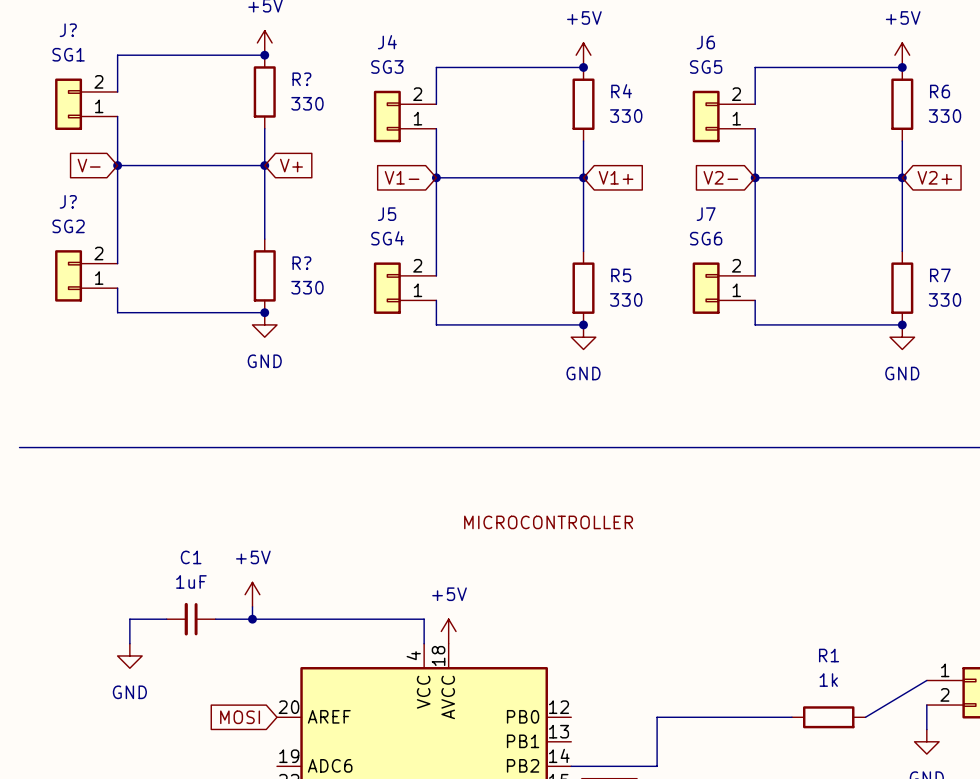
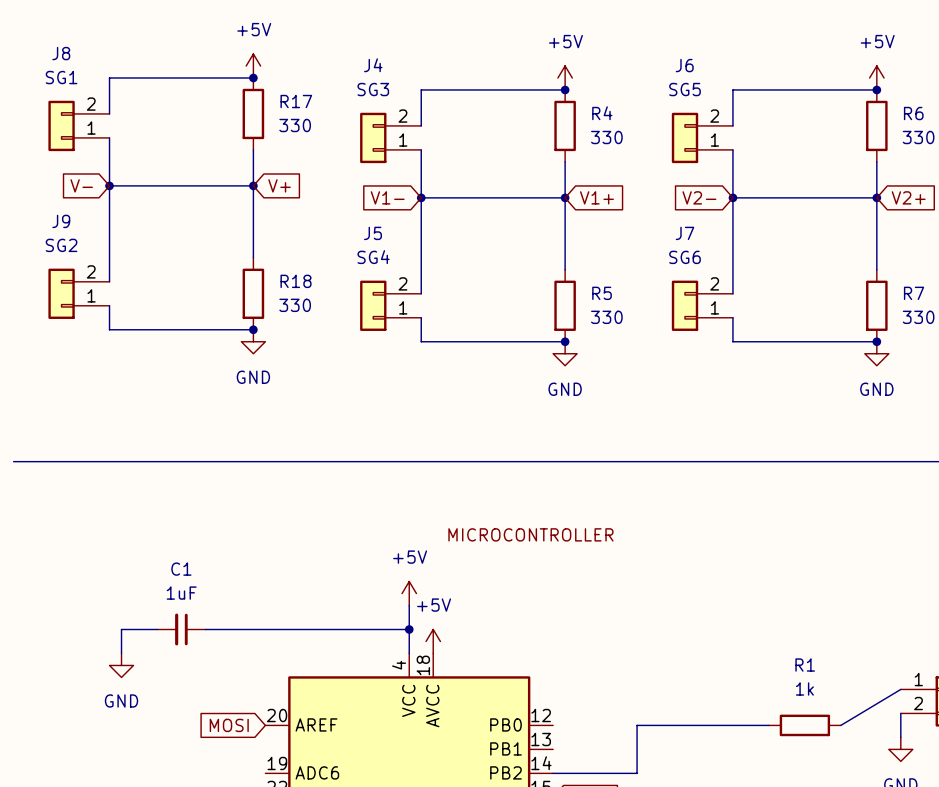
J? name: J? (68, 30) -> J8 (61, 53)
R? name: R? (301, 79) -> R17 (296, 101)
J? name: J? (68, 201) -> J9 (61, 221)
R? name: R? (301, 263) -> R18 (296, 281)
power symbol position: +5V (252, 594) -> +5V (409, 593)
wire: none -> (409, 605) (409, 629)
wire: (252, 606) (252, 619) -> none
junction: (252, 619) -> none
junction: none -> (409, 629)

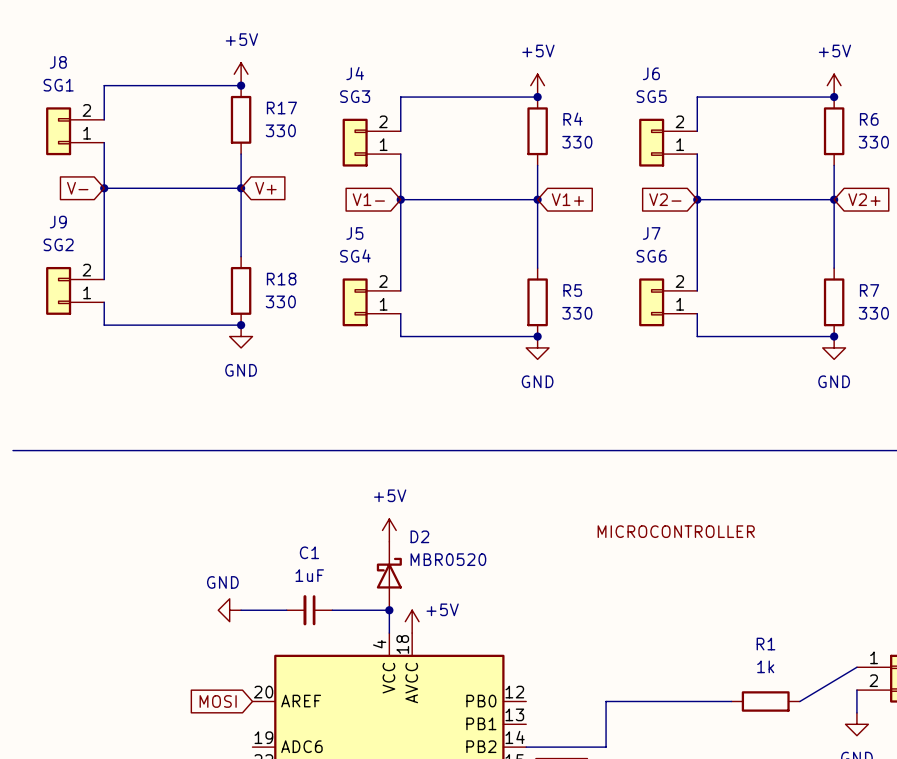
label position: MICROCONTROLLER (530, 534) -> MICROCONTROLLER (676, 531)
power symbol position: +5V (409, 593) -> +5V (389, 530)
D2: none -> MBR0520 (389, 576)
power symbol text position: +5V (434, 605) -> +5V (442, 609)
wire: (157, 629) (121, 629) (121, 653) -> none
C1 position: (181, 629) -> (309, 610)
wire: (205, 629) (253, 629) -> none
power symbol rotation: 0° (121, 665) -> 90° clockwise (229, 610)
power symbol position: GND (121, 665) -> GND (229, 610)
power symbol text position: GND (121, 700) -> GND (222, 582)

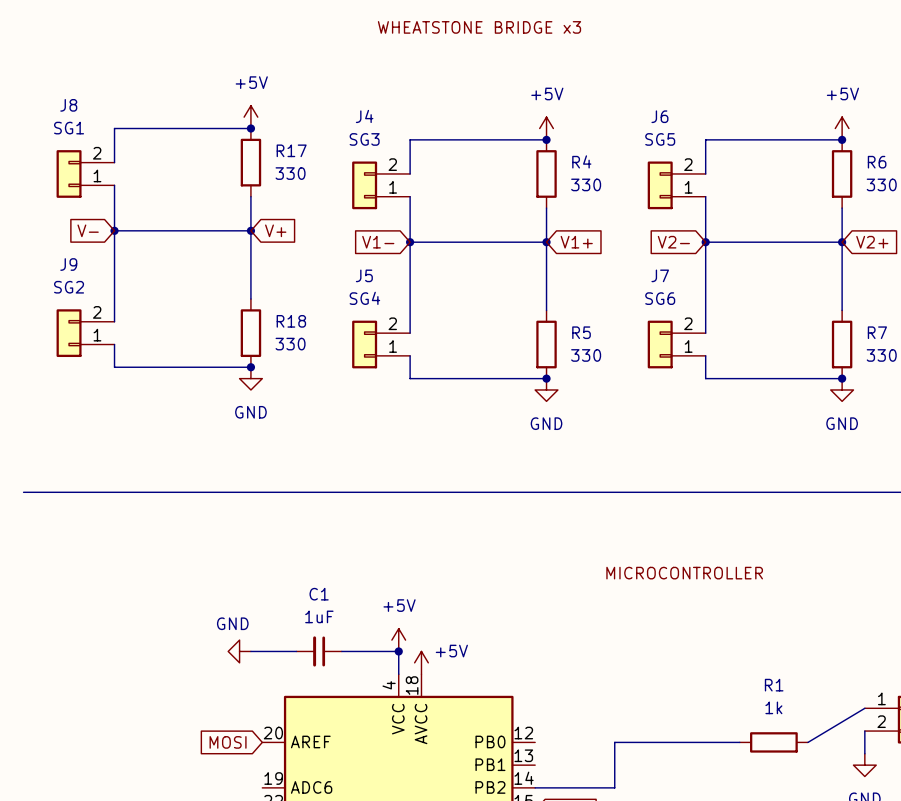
power symbol position: +5V (389, 530) -> +5V (398, 640)
D2: MBR0520 (389, 576) -> none

